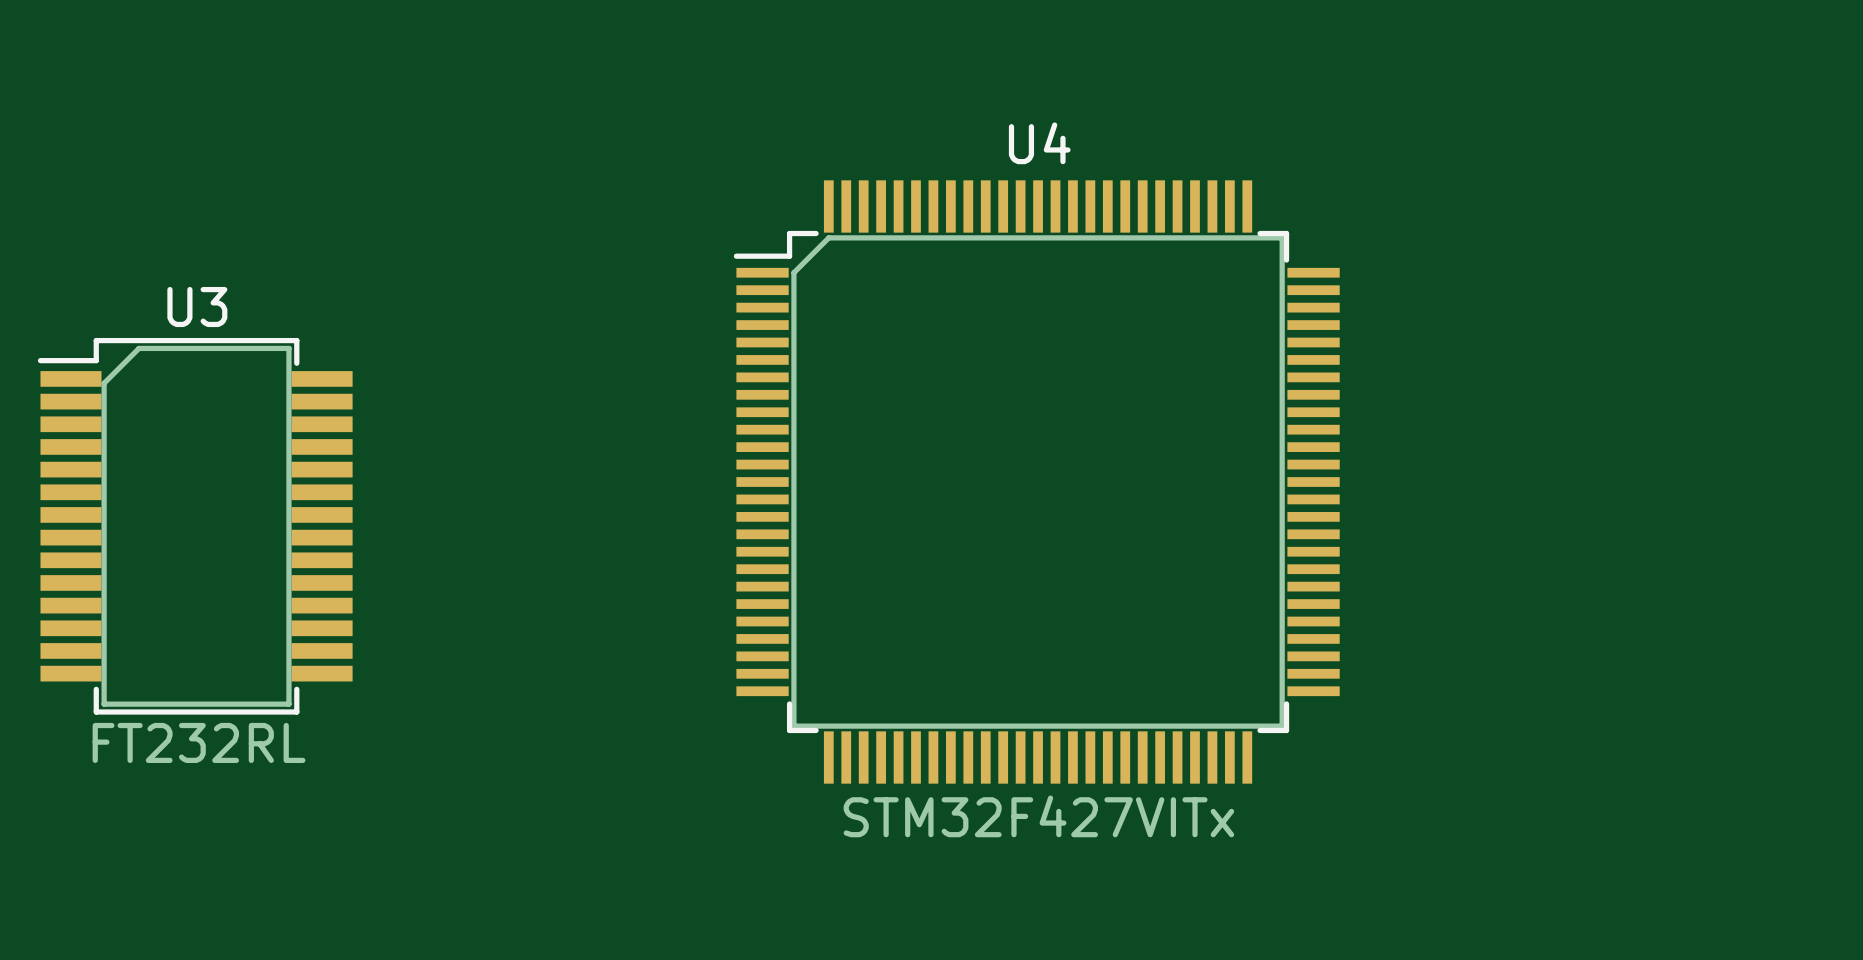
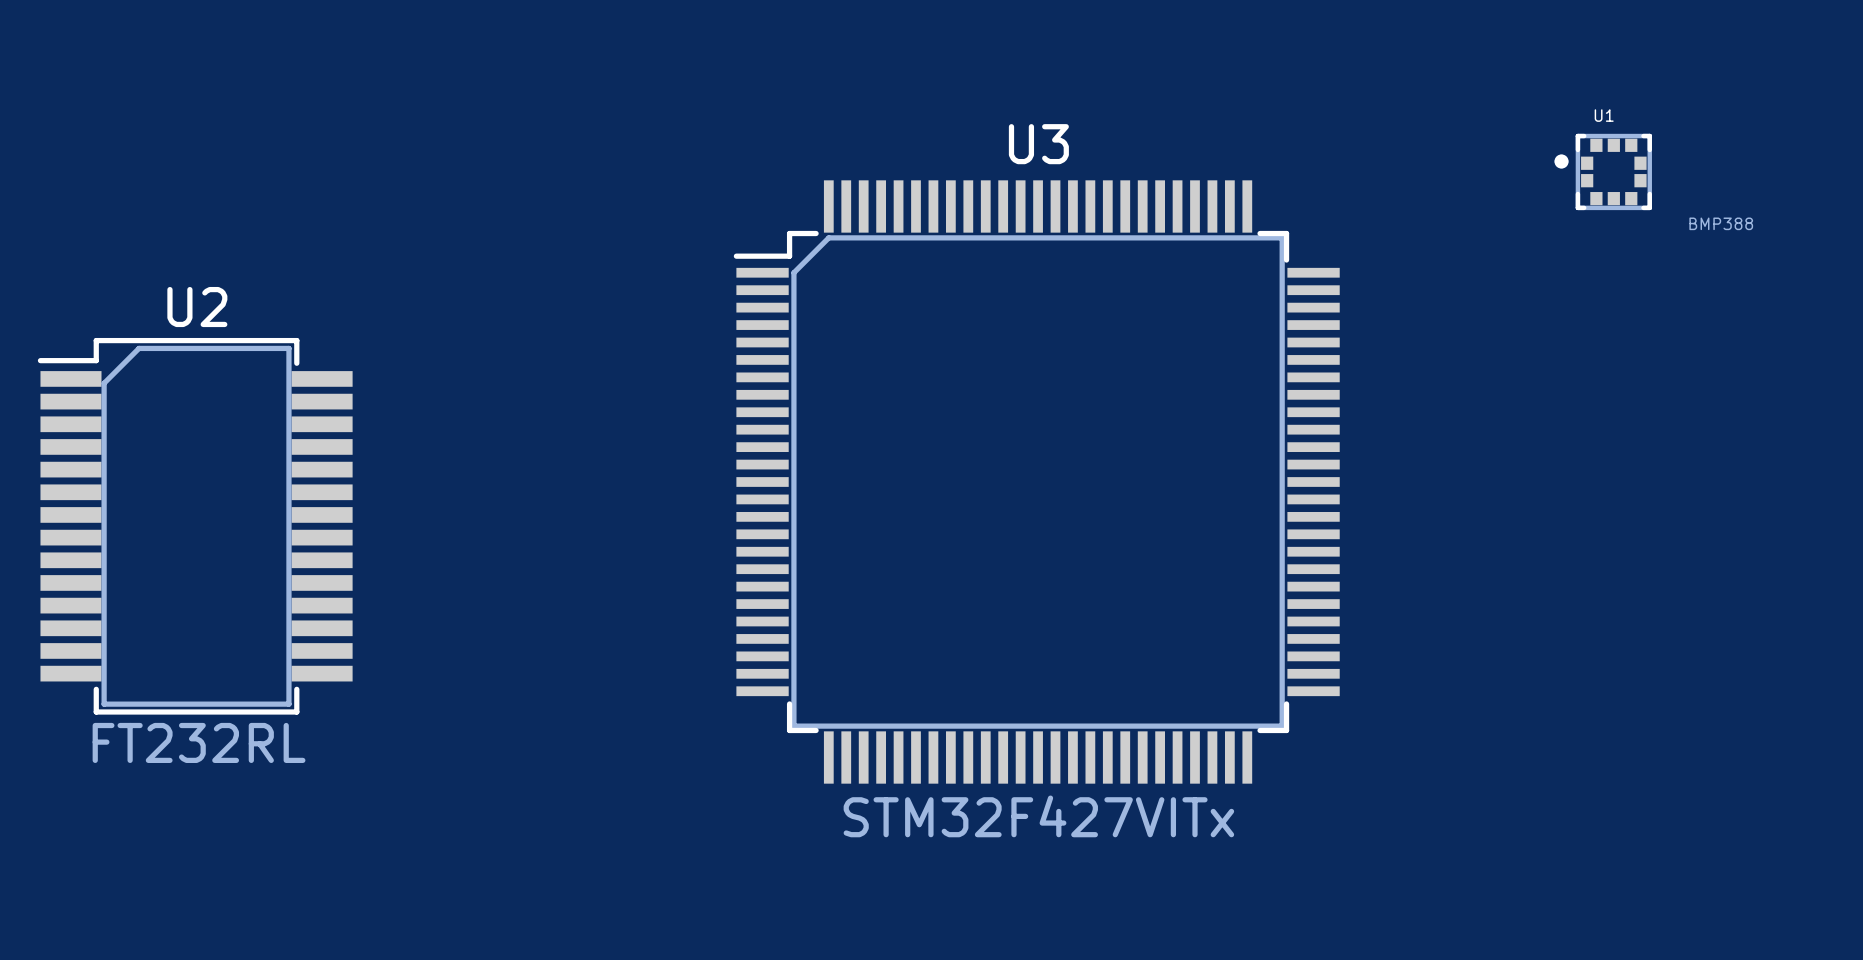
U4 name: U4 (1039, 143) -> U3 (1038, 144)
U1: none -> BMP388 (1603, 171)
U3 name: U3 (197, 307) -> U2 (197, 307)

